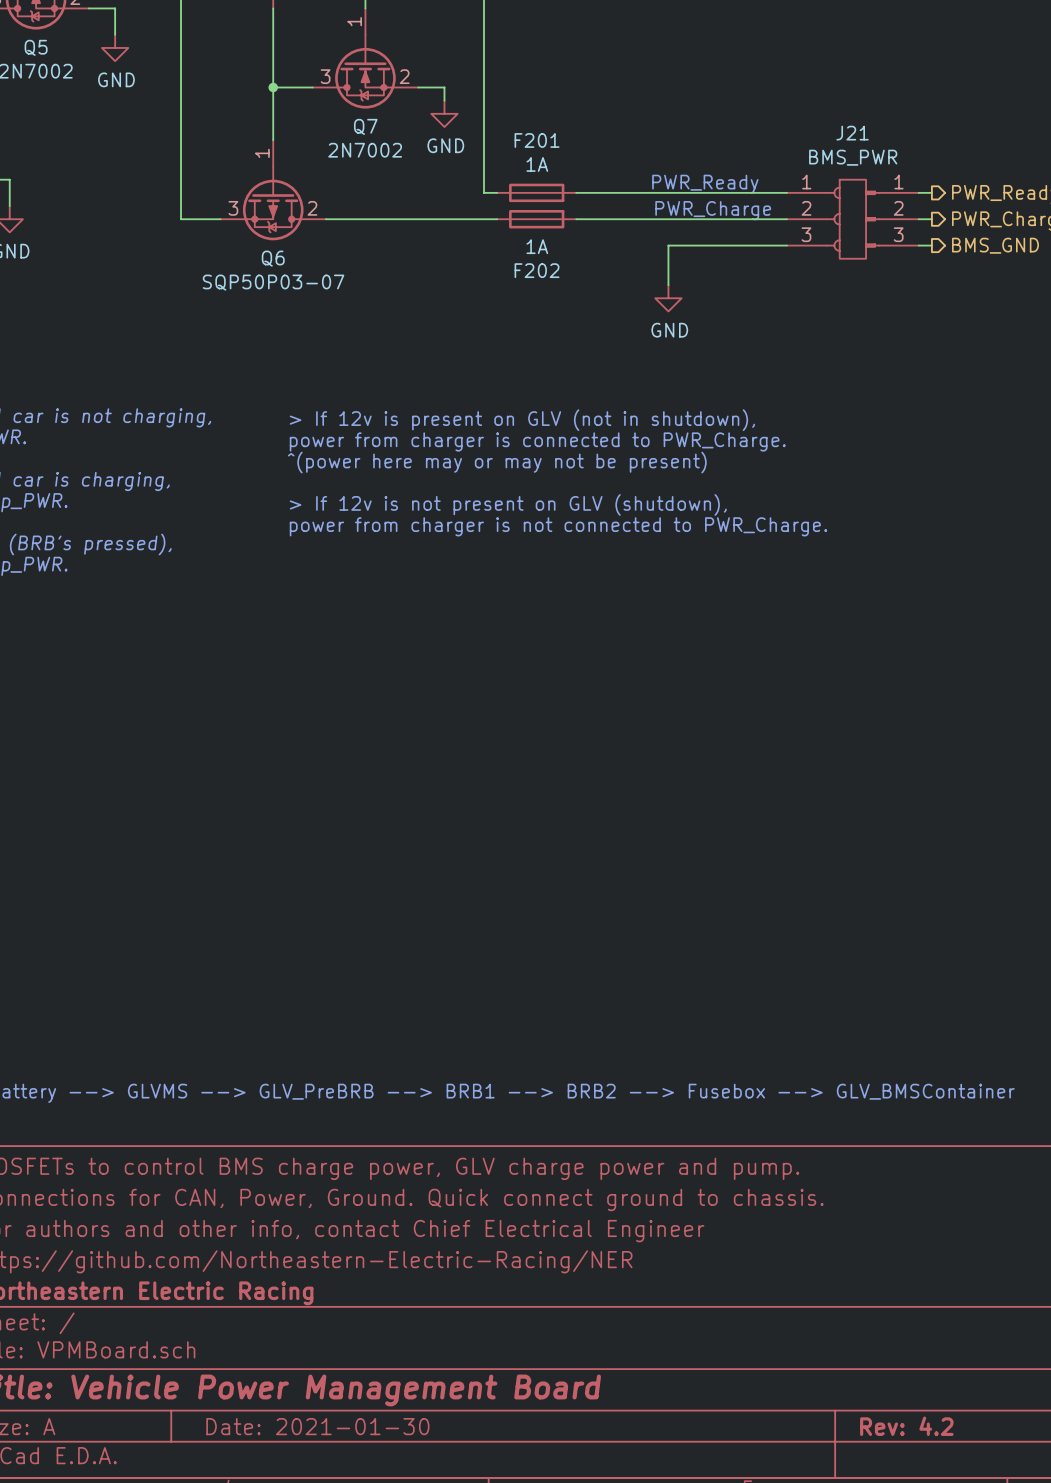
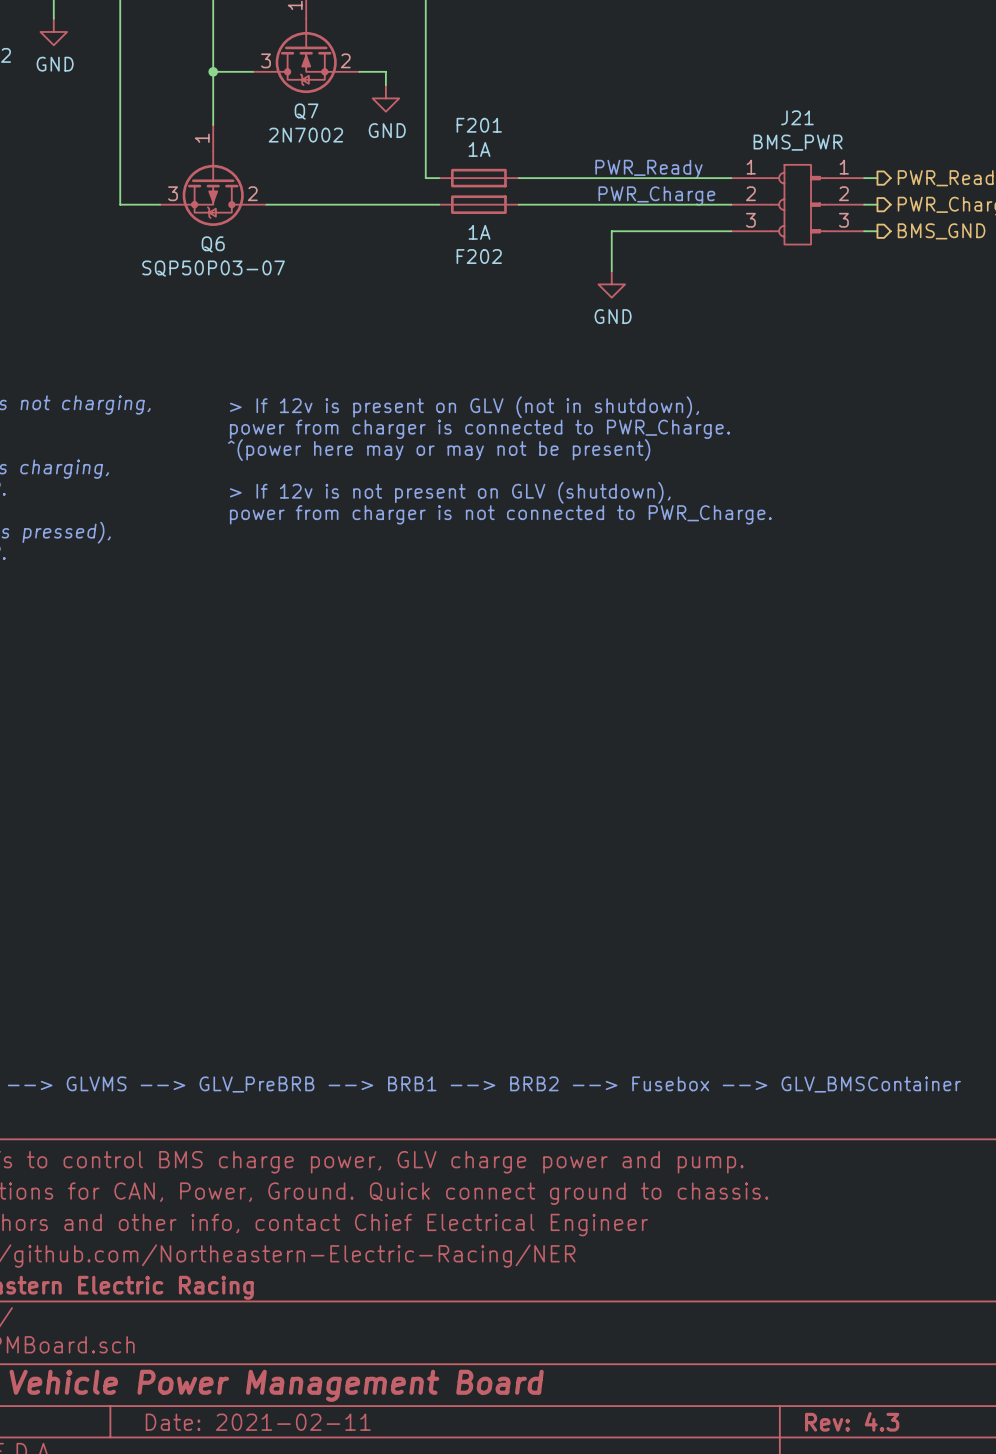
title block: Date: 2021-01-30 (317, 1426) -> Date: 2021-02-11 (258, 1422)
title block: Rev: 4.2 (906, 1426) -> Rev: 4.3 (852, 1421)

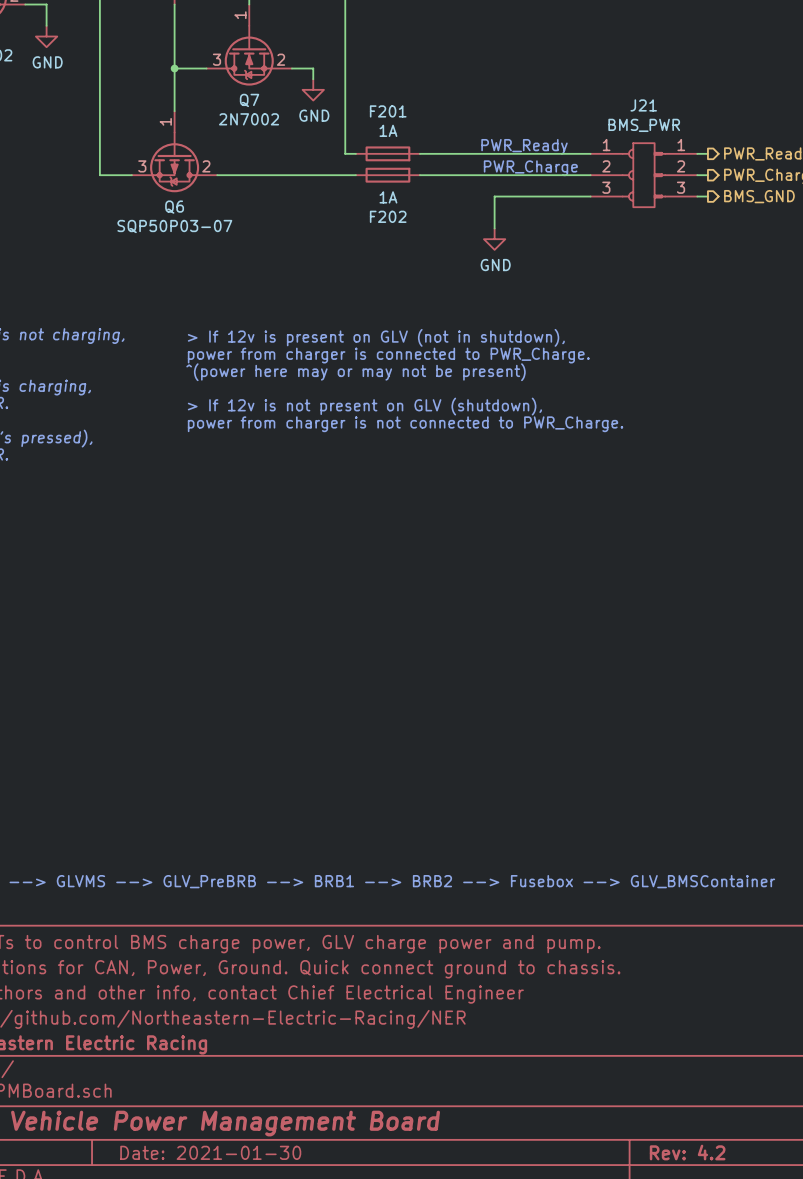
title block: Rev: 4.3 (852, 1421) -> Rev: 4.2 (687, 1152)
title block: Date: 2021-02-11 (258, 1422) -> Date: 2021-01-30 (210, 1152)

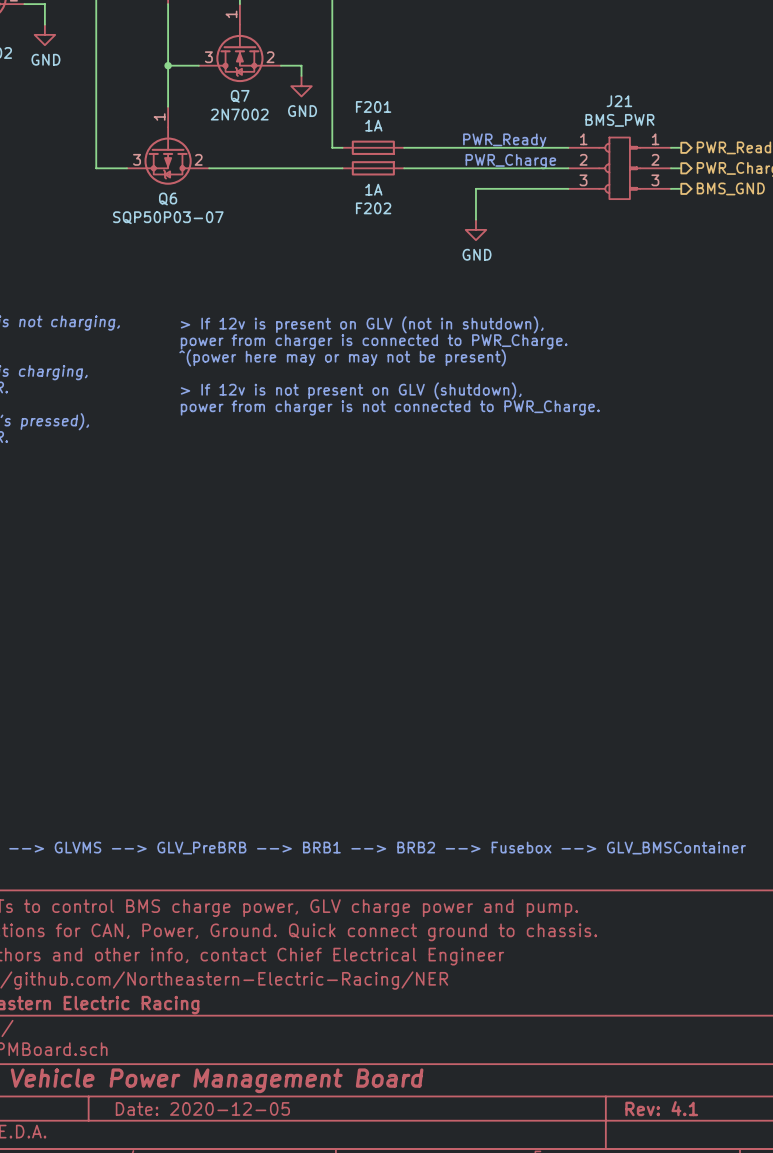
title block: Date: 2021-01-30 (210, 1152) -> Date: 2020-12-05 (202, 1108)
title block: Rev: 4.2 (687, 1152) -> Rev: 4.1 (661, 1108)

